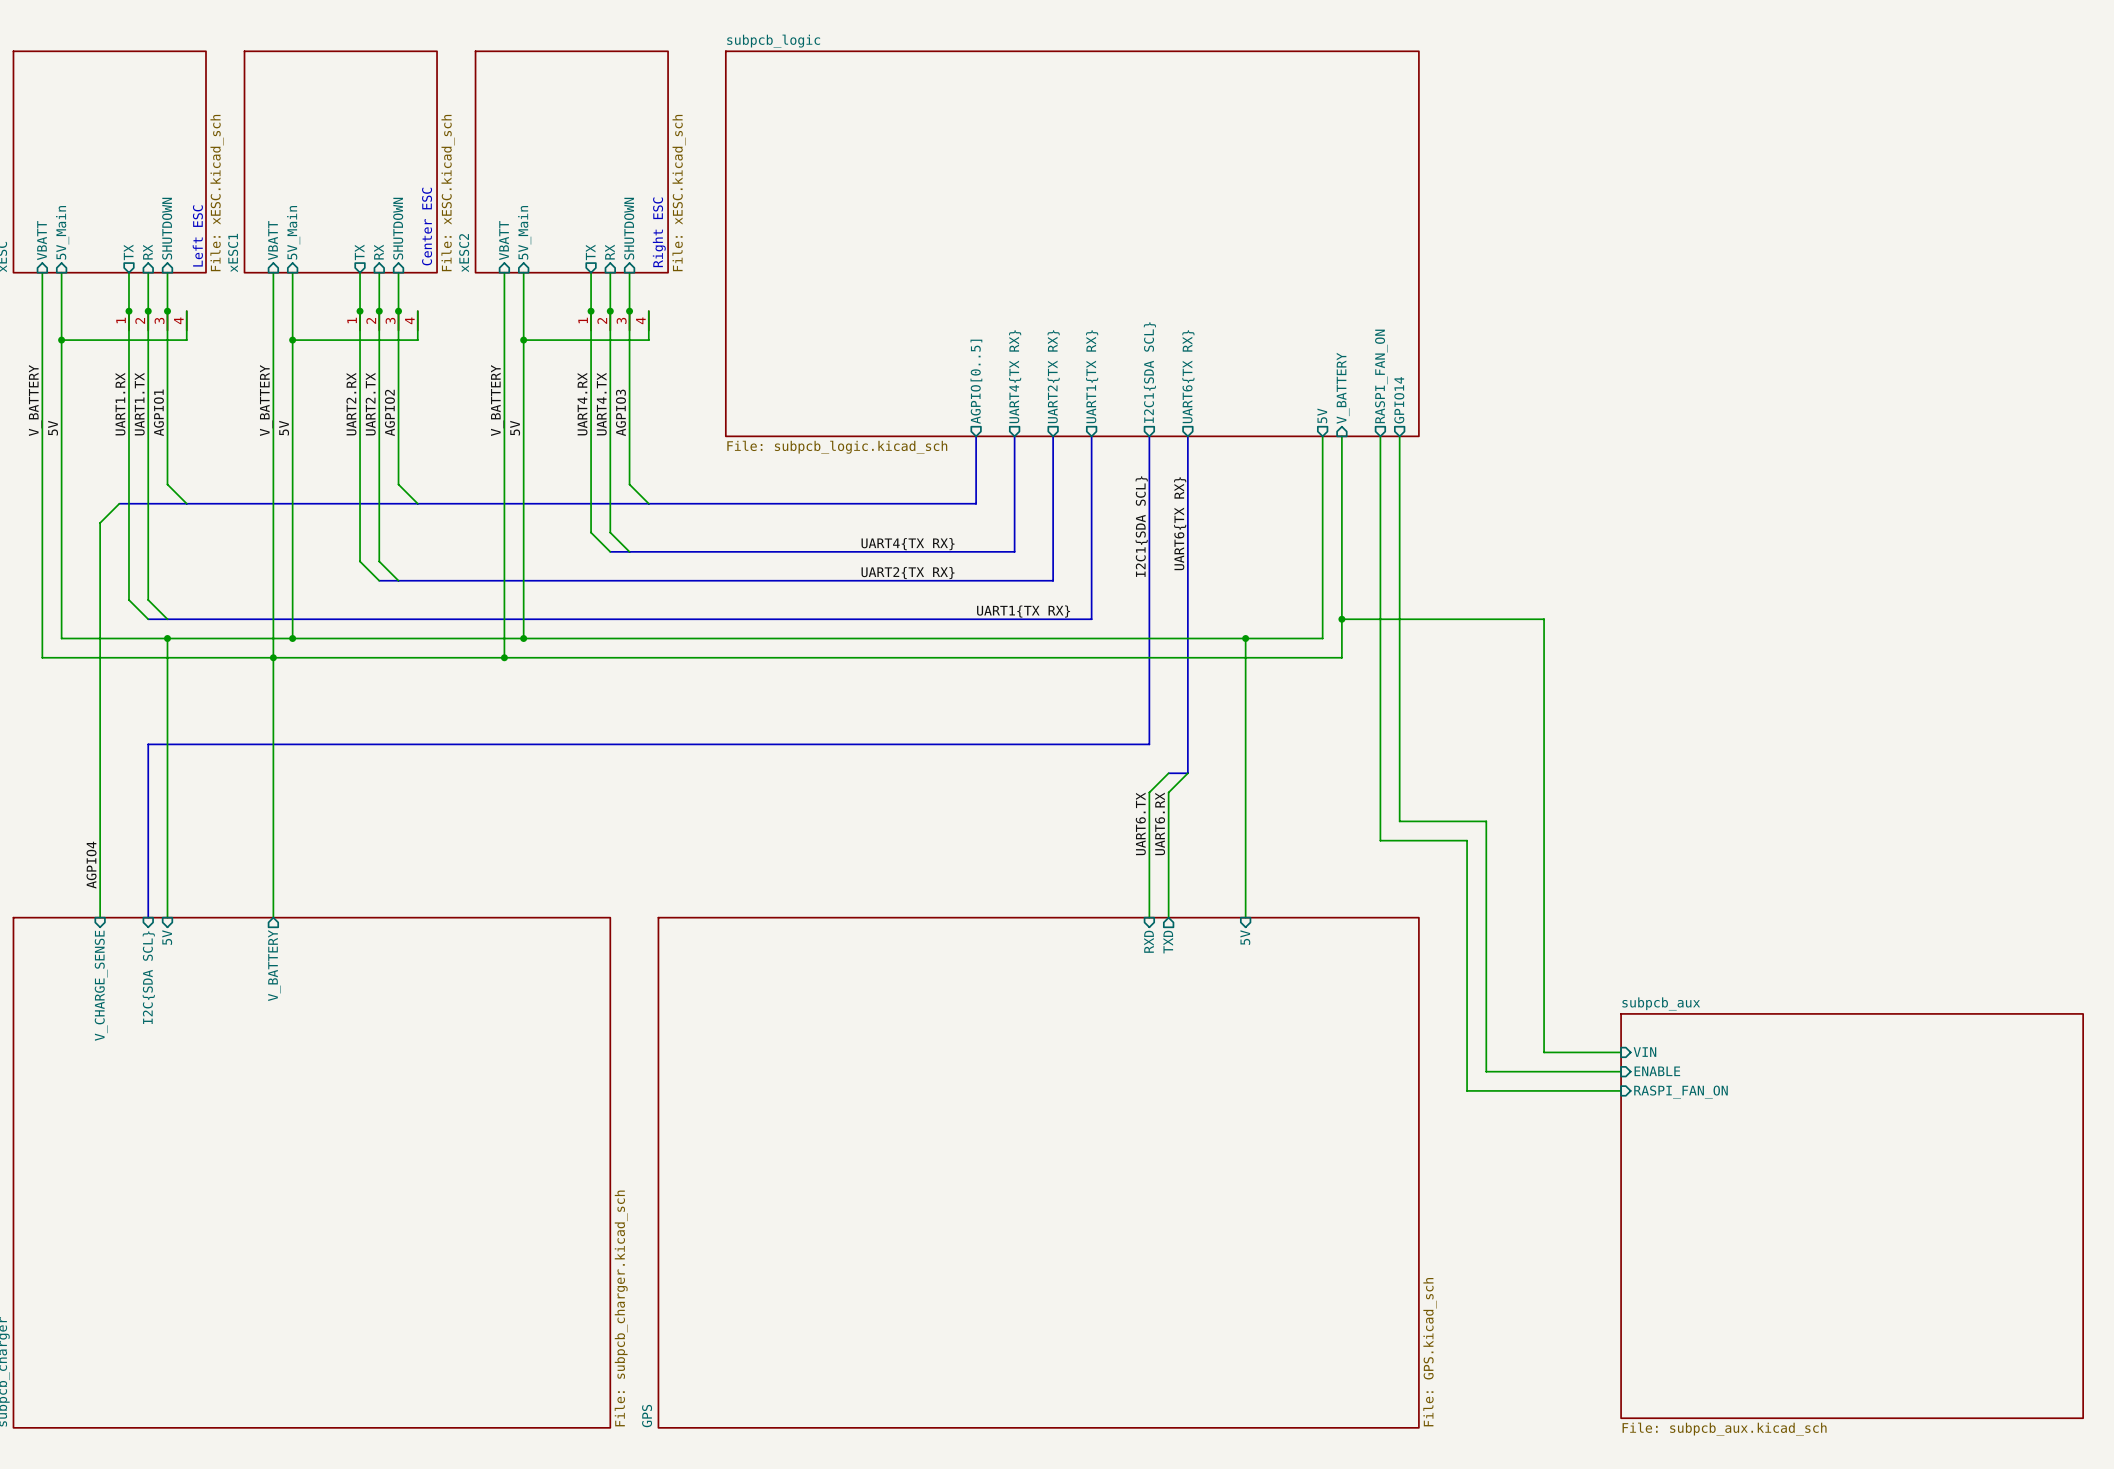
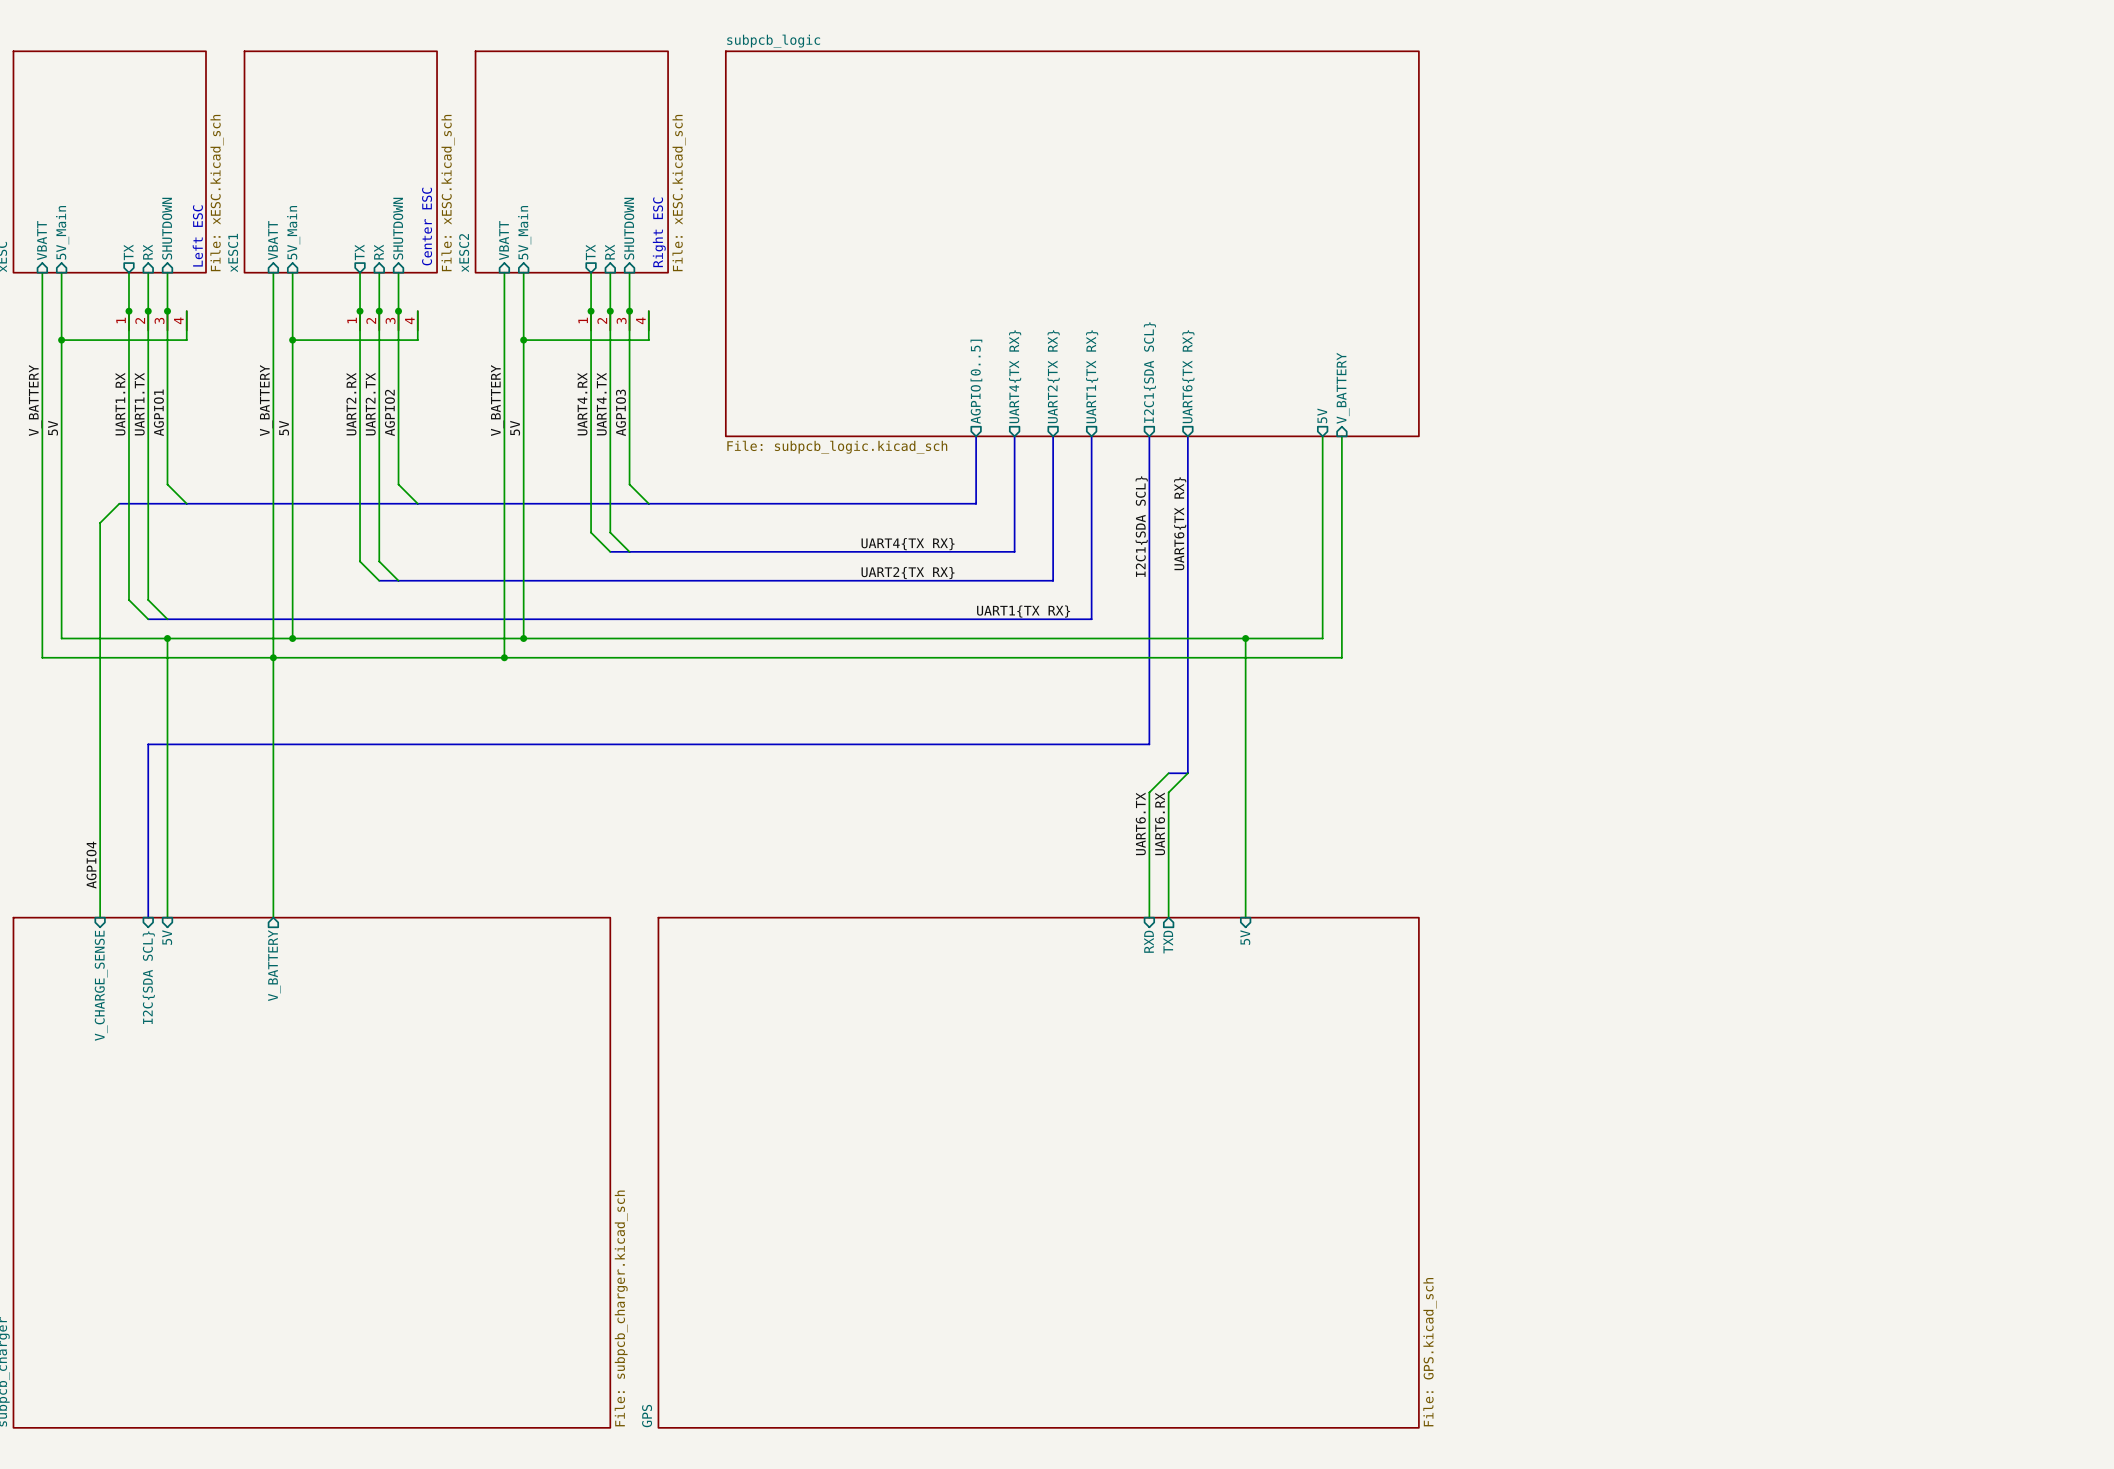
sheet pin: RASPI_FAN_ON (1381, 376) -> none
sheet pin: GPIO14 (1399, 400) -> none
wire: (1380, 436) (1380, 840) (1467, 840) (1467, 1090) (1621, 1090) -> none
wire: (1399, 436) (1399, 821) (1486, 821) (1486, 1071) (1621, 1071) -> none
wire: (1341, 619) (1544, 619) (1544, 1052) (1621, 1052) -> none
junction: (1341, 619) -> none
sheet pin: VIN (1644, 1052) -> none
sheet pin: ENABLE (1657, 1071) -> none
sheet pin: RASPI_FAN_ON (1681, 1092) -> none
sheet subpcb_aux: File: subpcb_aux.kicad_sch (1852, 1216) -> none

